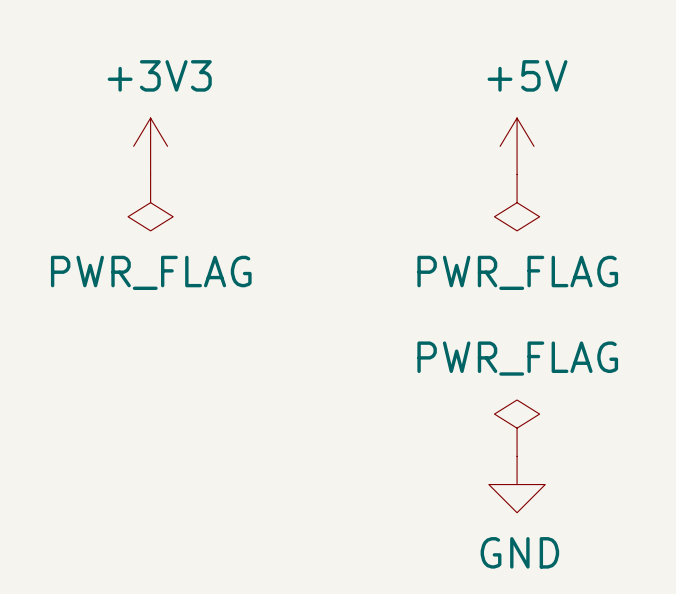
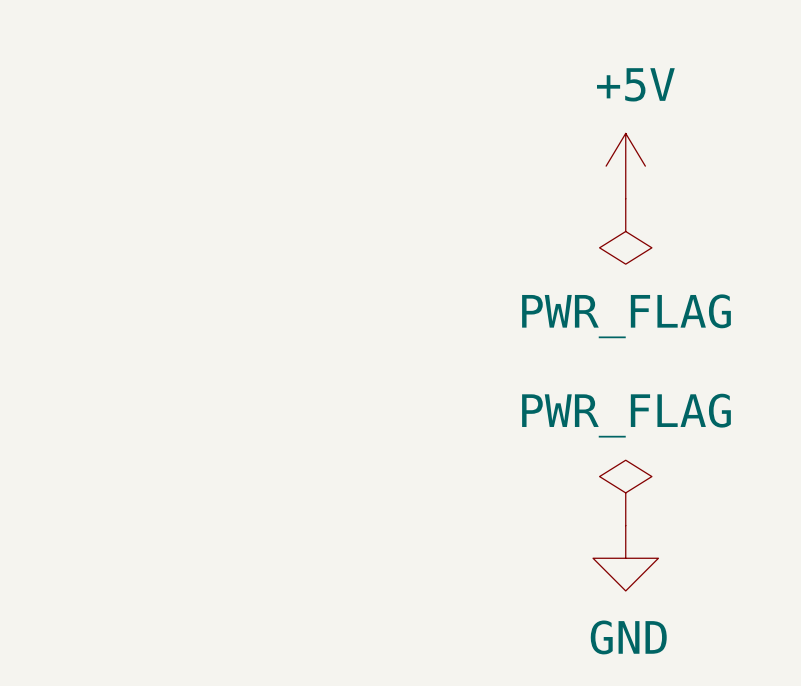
power symbol: +3V3 (150, 146) -> none
power symbol: PWR_FLAG (150, 202) -> none

